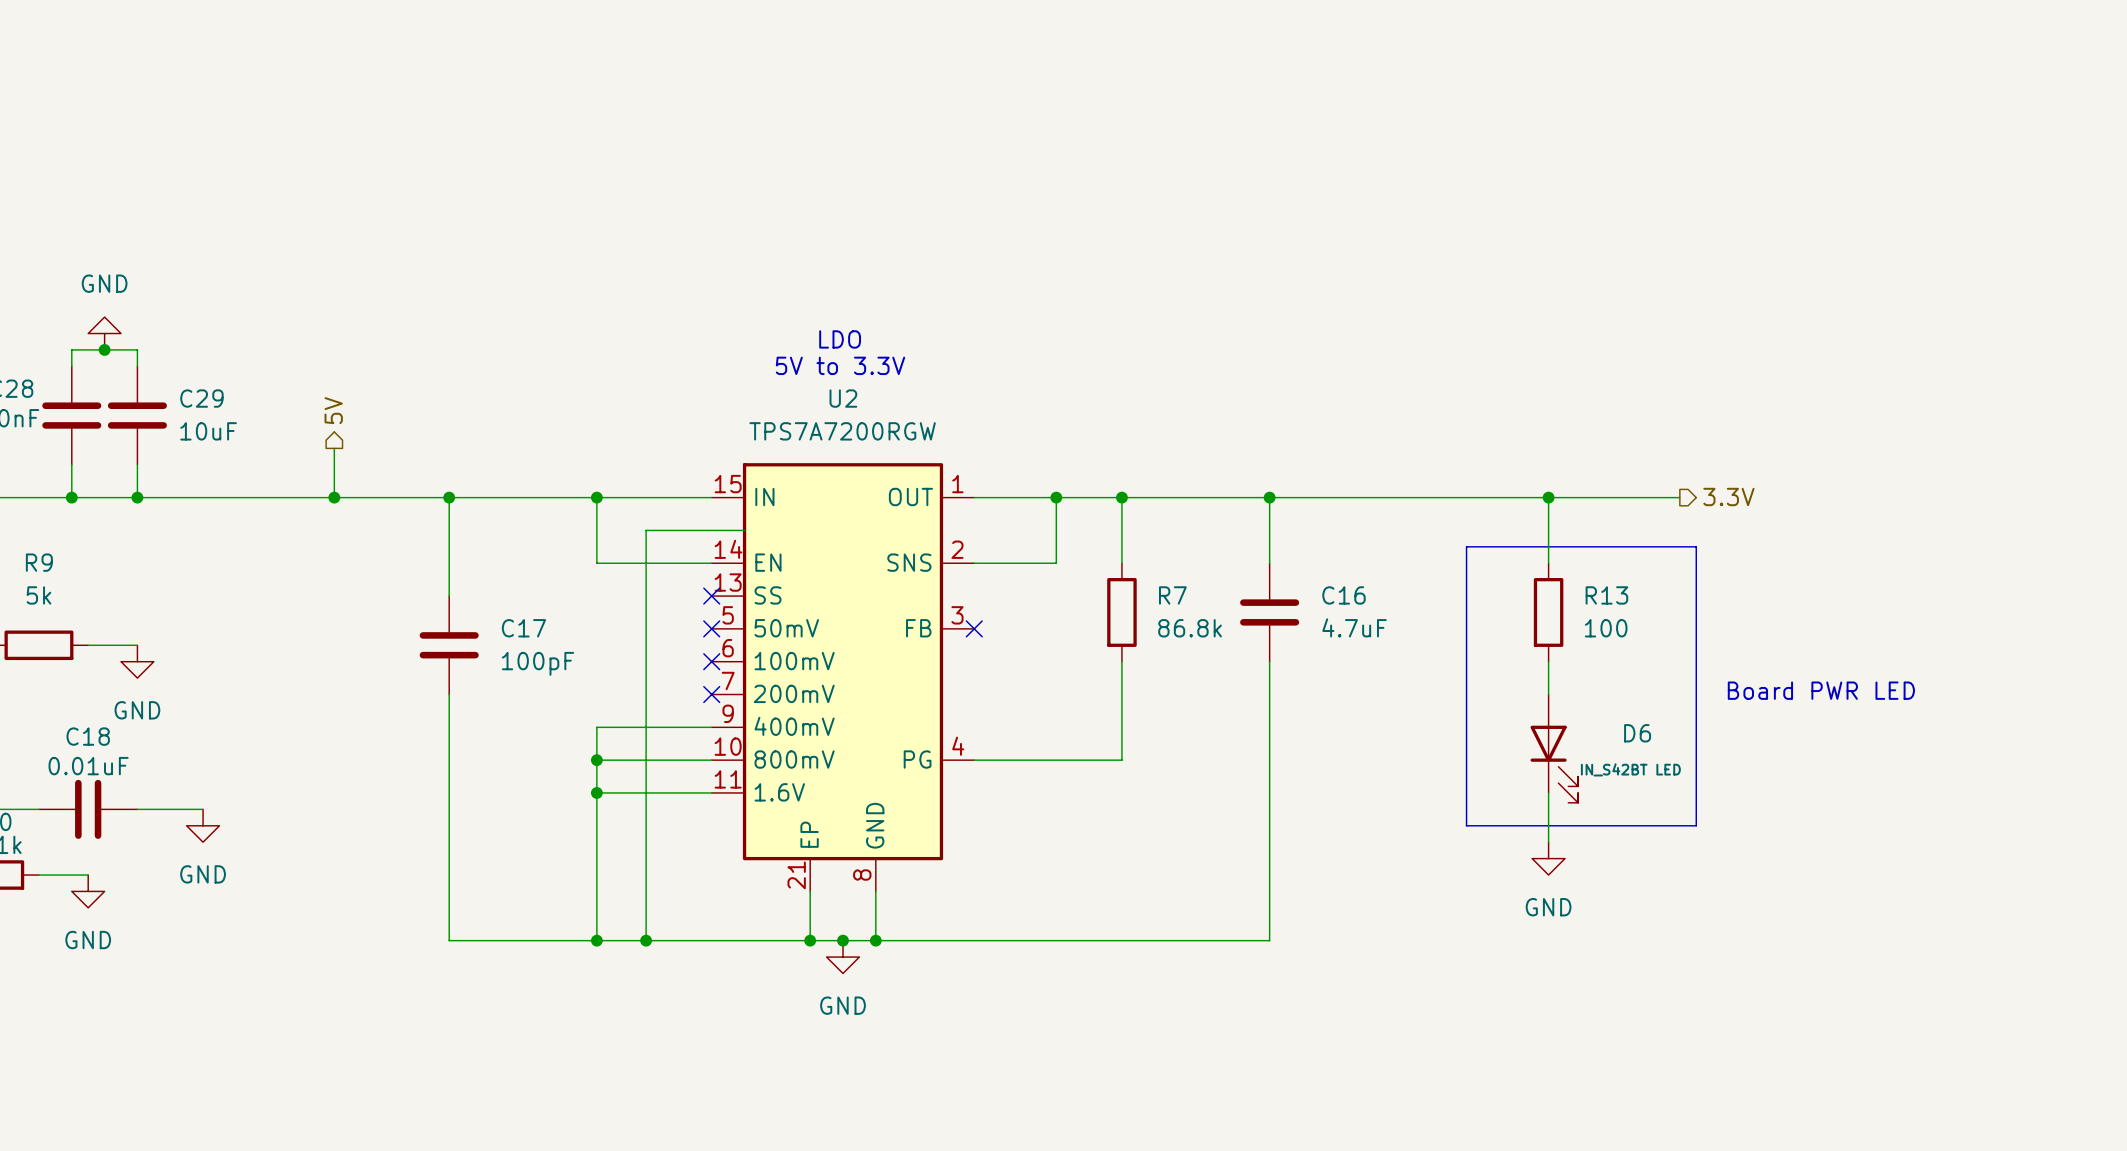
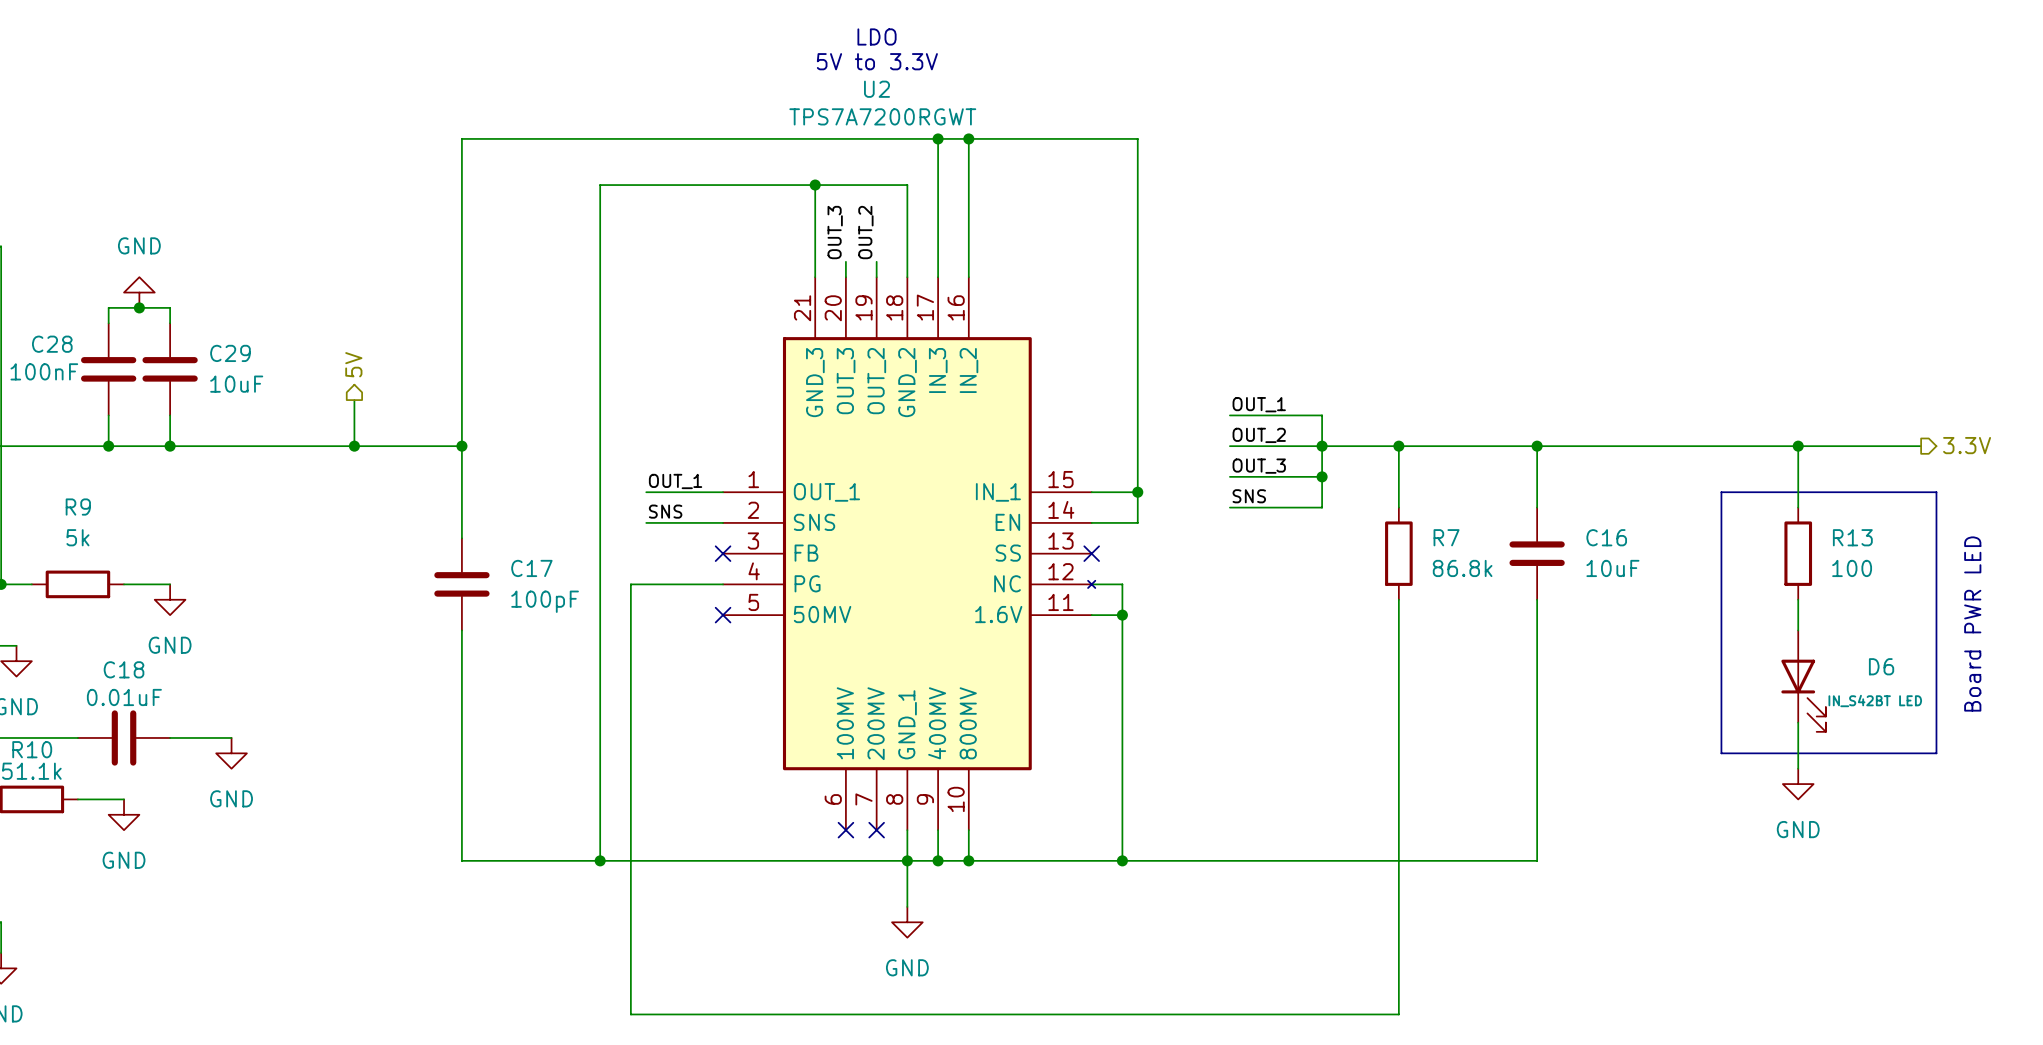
wire: none -> (938, 138) (938, 277)
junction: none -> (938, 138)
wire: none -> (968, 138) (968, 277)
junction: none -> (968, 138)
wire: none -> (815, 185) (815, 277)
junction: none -> (815, 185)
label: none -> OUT_3 (835, 232)
label: none -> OUT_2 (865, 232)
wire: none -> (845, 261) (845, 277)
wire: none -> (876, 261) (876, 277)
wire: none -> (907, 277) (907, 185) (600, 185) (600, 446)
text position: LDO (840, 339) -> LDO (877, 36)
text position: 5V to 3.3V (840, 365) -> 5V to 3.3V (877, 61)
U2 name position: U2 (843, 398) -> U2 (877, 89)
U2 value: TPS7A7200RGW (842, 431) -> TPS7A7200RGWT (882, 116)
label: none -> OUT_1 (1259, 404)
U2 symbol: [711, 463, 975, 892] -> [723, 277, 1096, 831]
label: none -> OUT_2 (1259, 435)
hierarchical label: 3.3V (1728, 496) -> none
hierarchical label: none -> 3.3V (1967, 445)
wire: (449, 497) (711, 497) -> (461, 446) (461, 138) (1137, 138) (1137, 522) (1091, 522)
junction: (596, 497) -> none
wire: (974, 497) (1269, 497) (1269, 563) -> (1229, 415) (1322, 415) (1322, 507) (1229, 507)
junction: (1056, 497) -> none
wire: (1121, 497) (1121, 563) -> none
junction: (1121, 497) -> none
junction: (1269, 497) -> none
junction: none -> (1322, 446)
wire: none -> (1398, 446) (1398, 507)
junction: none -> (1398, 446)
wire: (1548, 497) (1548, 563) -> (1537, 446) (1537, 507)
junction: (1548, 497) -> none
junction: none -> (1537, 446)
wire: none -> (1613, 446) (1921, 446)
wire: none -> (1798, 446) (1798, 507)
junction: none -> (1798, 446)
label: none -> OUT_3 (1259, 466)
wire: (744, 530) (646, 530) (646, 940) -> none
wire: none -> (1229, 476) (1322, 476)
junction: none -> (1322, 476)
label: none -> OUT_1 (675, 481)
wire: none -> (646, 492) (723, 492)
wire: none -> (1091, 492) (1137, 492)
junction: none -> (1137, 492)
line: (1466, 546) (1696, 546) (1696, 825) (1466, 825) (1466, 546) -> none
line: none -> (1721, 492) (1936, 492) (1936, 753) (1721, 753) (1721, 492)
label: none -> SNS (1249, 496)
wire: (596, 563) (711, 563) -> (600, 507) (600, 661)
label: none -> SNS (665, 511)
wire: none -> (646, 522) (723, 522)
no-connect mark: (711, 596) -> none
no-connect mark: none -> (723, 553)
no-connect mark: none -> (1091, 553)
R7 position: (1121, 612) -> (1398, 553)
C16 position: (1269, 612) -> (1537, 553)
R13 position: (1548, 612) -> (1798, 553)
C16 value: 4.7uF (1354, 627) -> 10uF (1612, 568)
no-connect mark: (711, 628) -> none
no-connect mark: (974, 628) -> none
wire: none -> (723, 584) (630, 584) (630, 1014) (1398, 1014) (1398, 599)
wire: none -> (1091, 584) (1122, 584) (1122, 860)
no-connect mark: (711, 661) -> none
wire: (1121, 661) (1121, 760) (974, 760) -> none
wire: (1269, 661) (1269, 940) -> (1537, 599) (1537, 860) (1229, 860)
wire: (1548, 661) (1548, 694) -> none
wire: none -> (1798, 599) (1798, 630)
no-connect mark: none -> (723, 615)
wire: none -> (1091, 615) (1122, 615)
junction: none -> (1122, 615)
text rotation: 0° (1821, 690) -> 90° counterclockwise (1972, 624)
text position: Board PWR LED (1821, 690) -> Board PWR LED (1972, 624)
no-connect mark: (711, 694) -> none
wire: (596, 727) (711, 727) -> none
D6 position: (1554, 748) -> (1803, 681)
wire: (596, 760) (711, 760) -> none
junction: (596, 760) -> none
wire: (596, 792) (711, 792) -> none
junction: (596, 792) -> none
wire: (1548, 792) (1548, 842) -> none
wire: none -> (1798, 722) (1798, 768)
power symbol: GND (1548, 858) -> none
power symbol: none -> GND (1798, 784)
wire: (810, 891) (810, 940) -> none
wire: (875, 891) (875, 940) -> none
no-connect mark: none -> (845, 830)
no-connect mark: none -> (876, 830)
wire: none -> (907, 830) (907, 906)
wire: none -> (938, 830) (938, 860)
wire: none -> (968, 830) (968, 860)
junction: (646, 940) -> none
junction: (810, 940) -> none
junction: (843, 940) -> none
junction: (875, 940) -> none
junction: none -> (907, 860)
junction: none -> (938, 860)
junction: none -> (968, 860)
junction: none -> (1122, 860)
power symbol position: GND (843, 957) -> GND (907, 922)

